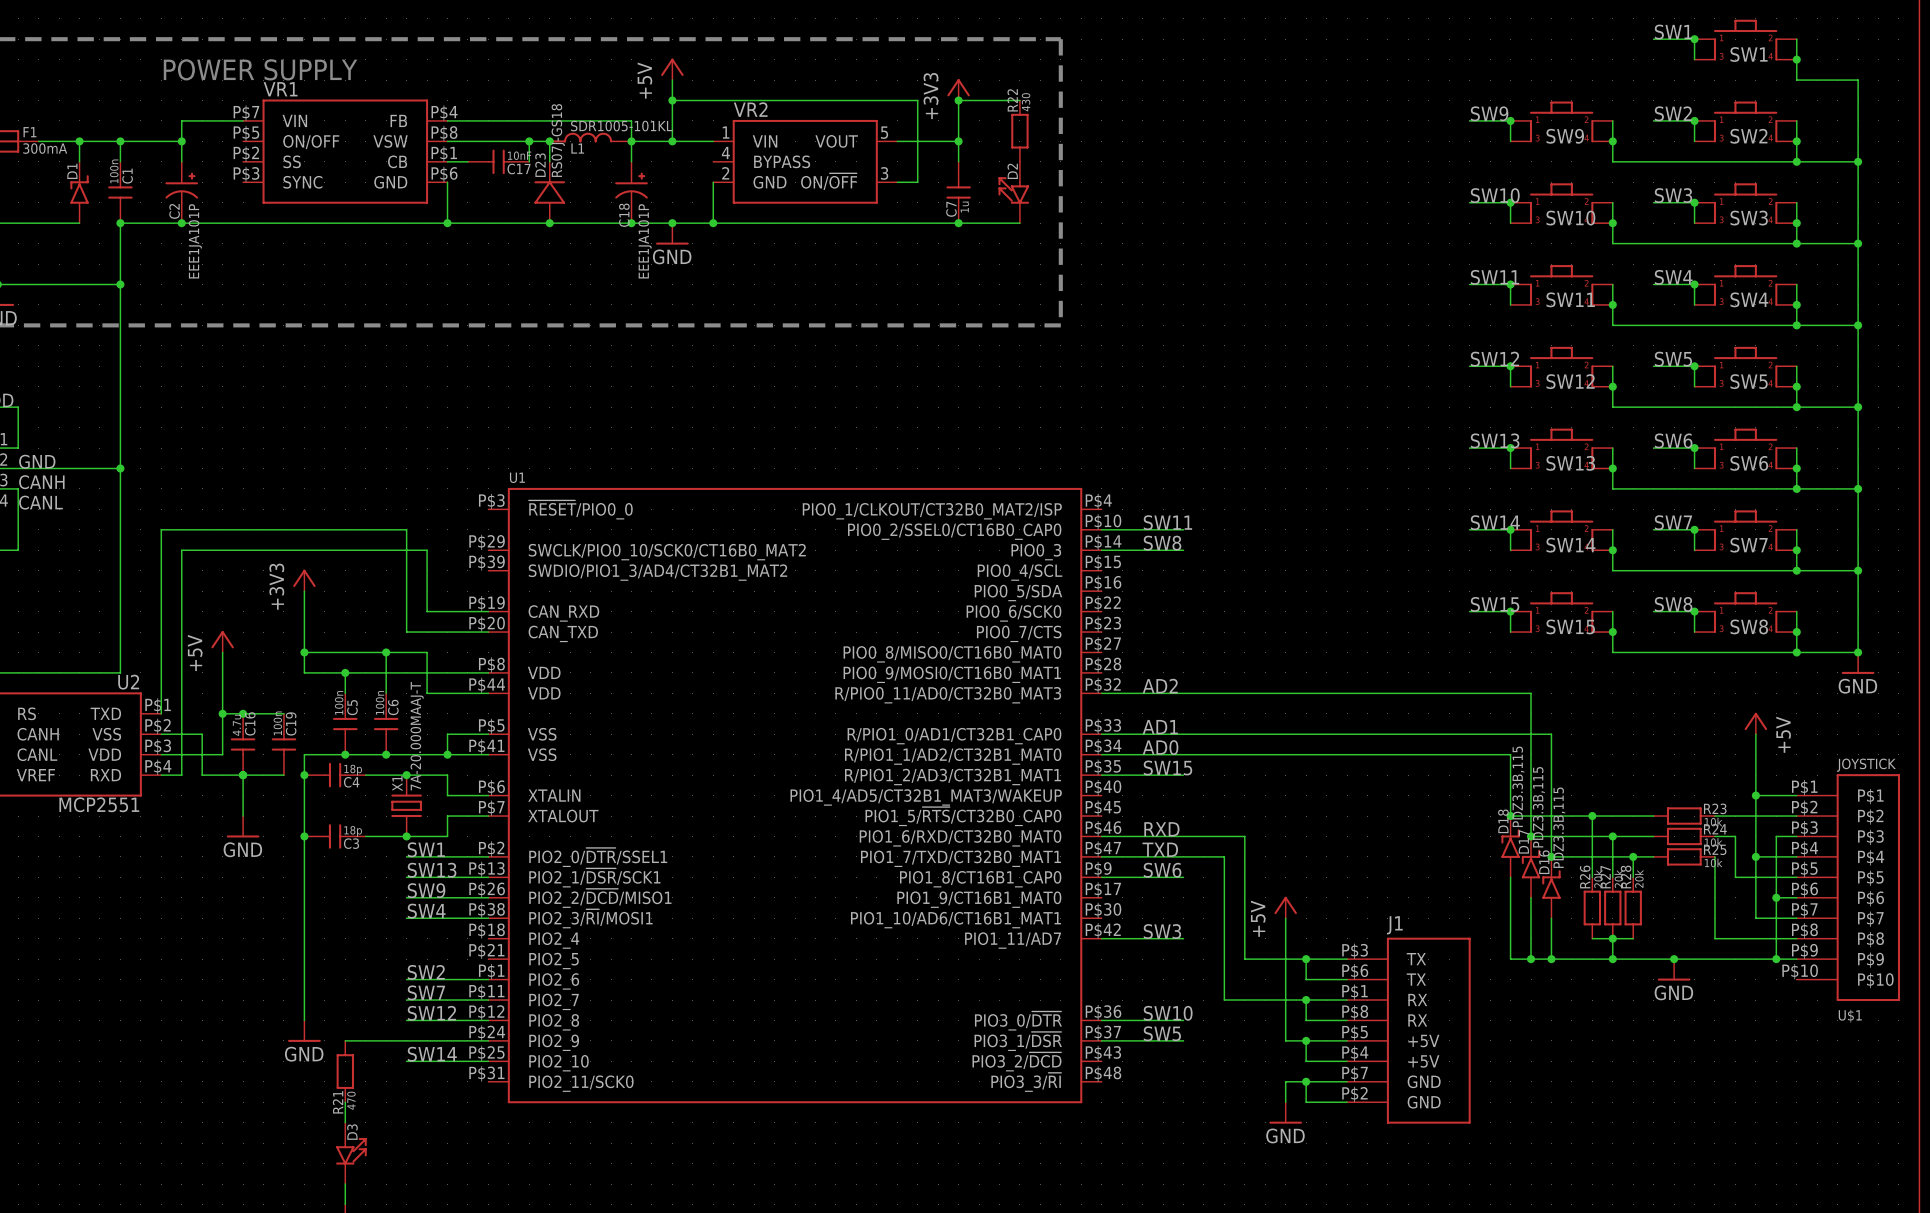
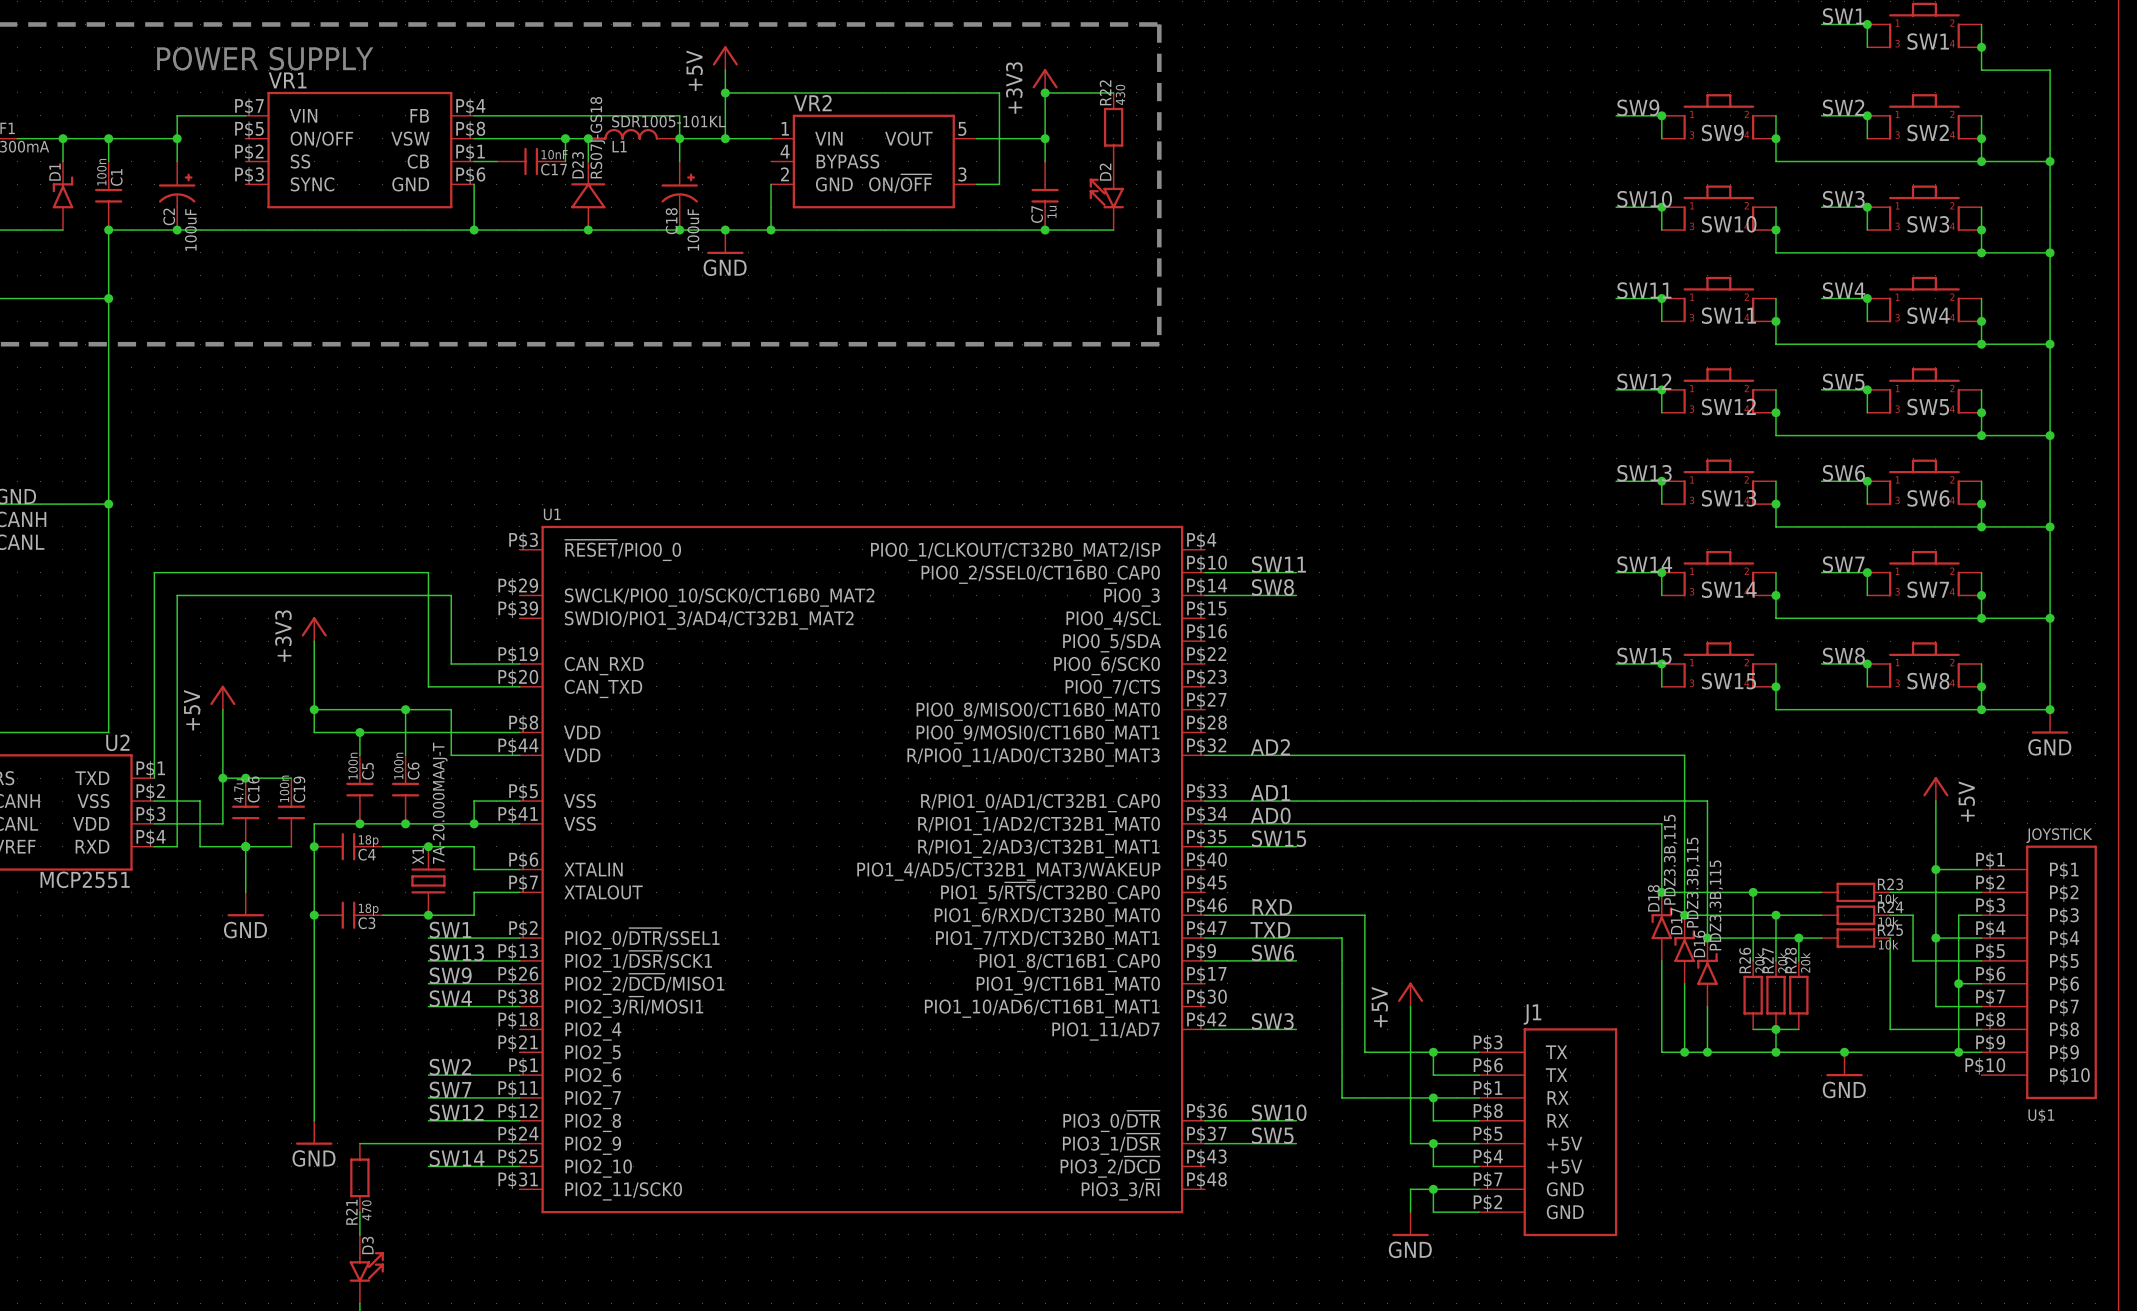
C2 value: EEE1JA101P (195, 241) -> 100uF (190, 229)
C18 value: EEE1JA101P (645, 241) -> 100uF (693, 229)

